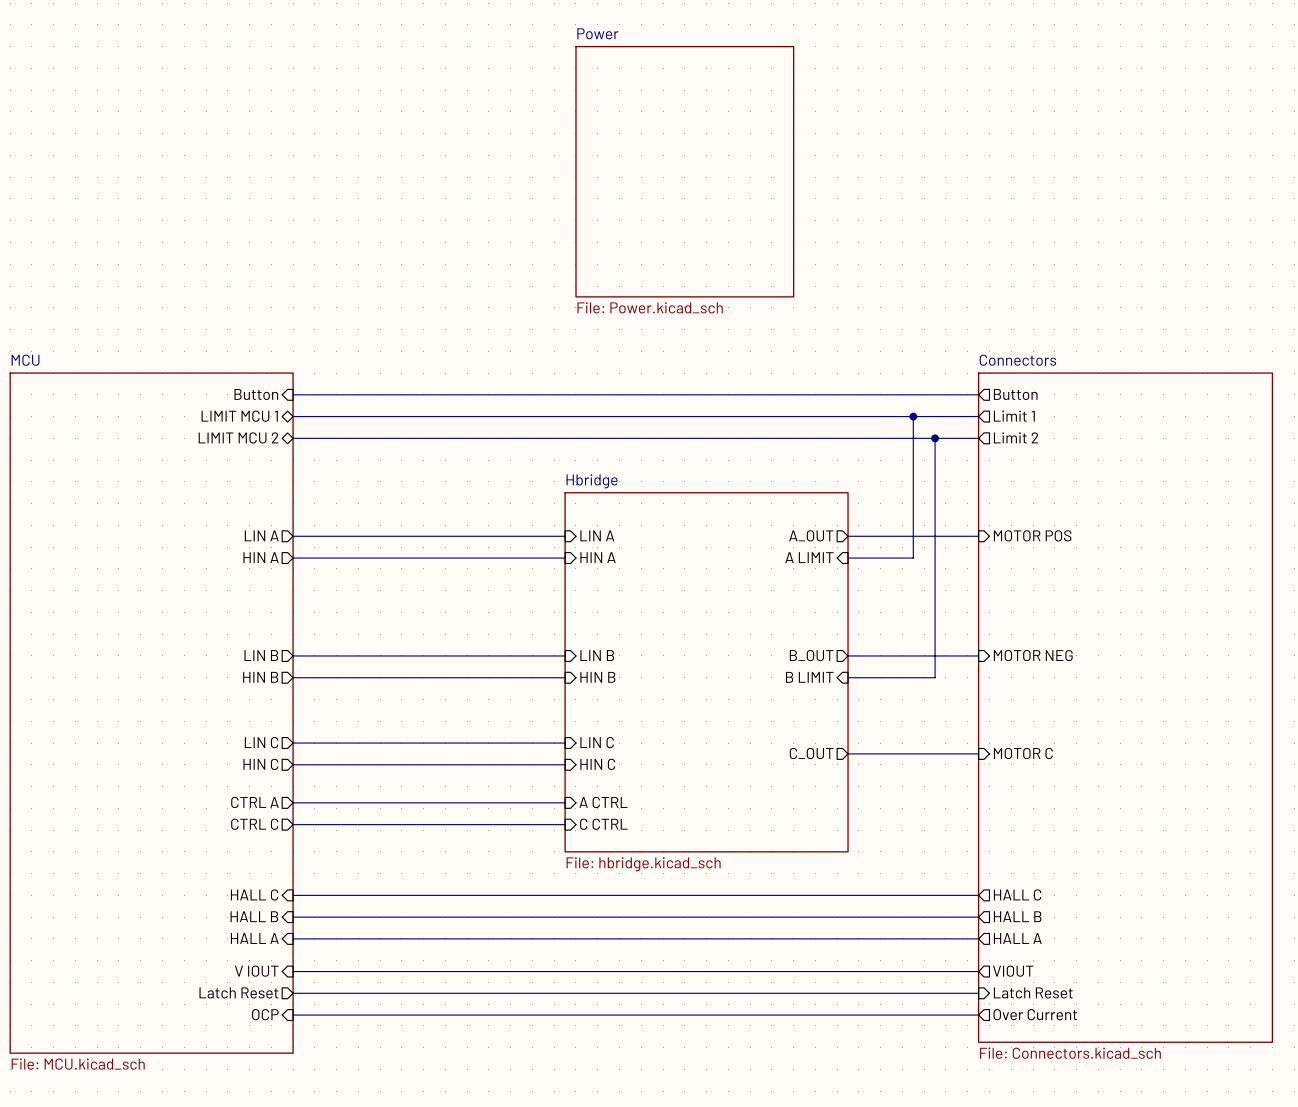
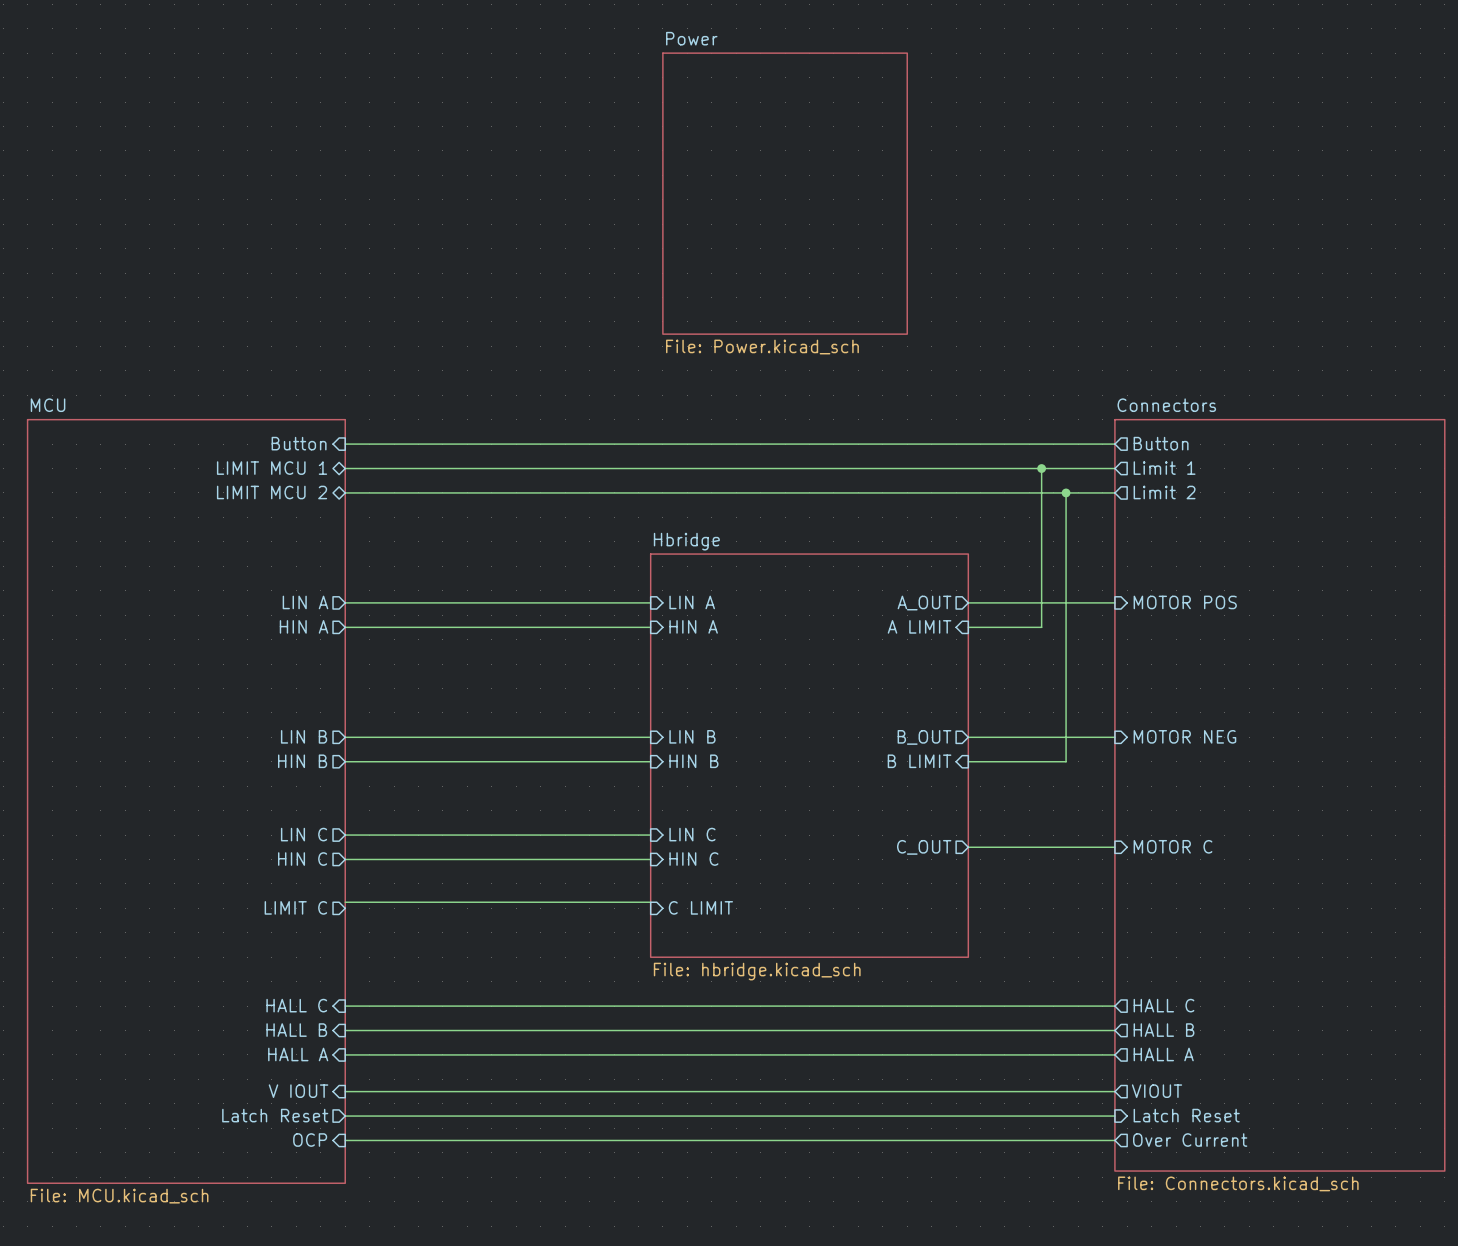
sheet pin: CTRL A (254, 802) -> LIMIT C (295, 907)
sheet pin: A CTRL (603, 802) -> C LIMIT (700, 907)
sheet pin: CTRL C (254, 824) -> none
wire: (293, 824) (565, 824) -> none
sheet pin: C CTRL (603, 824) -> none

